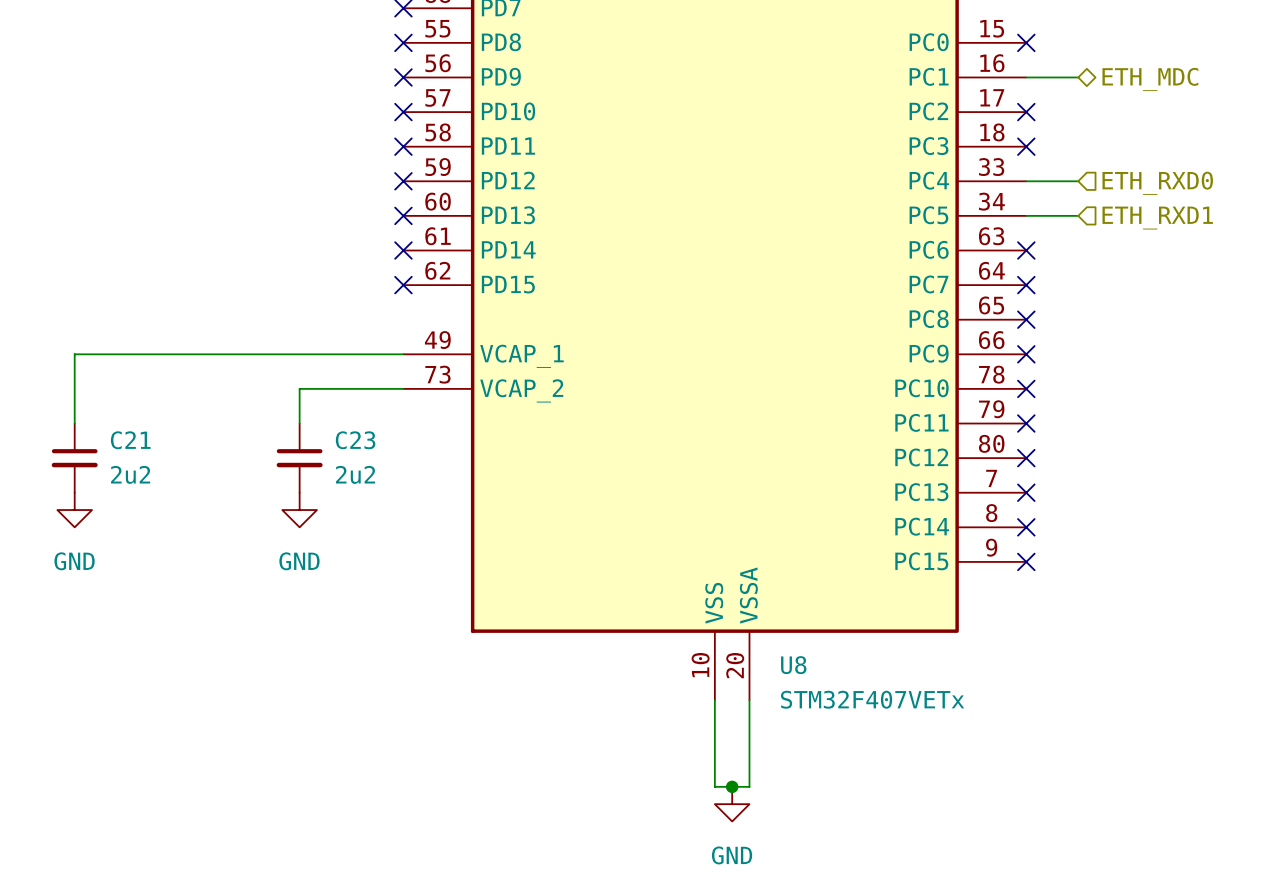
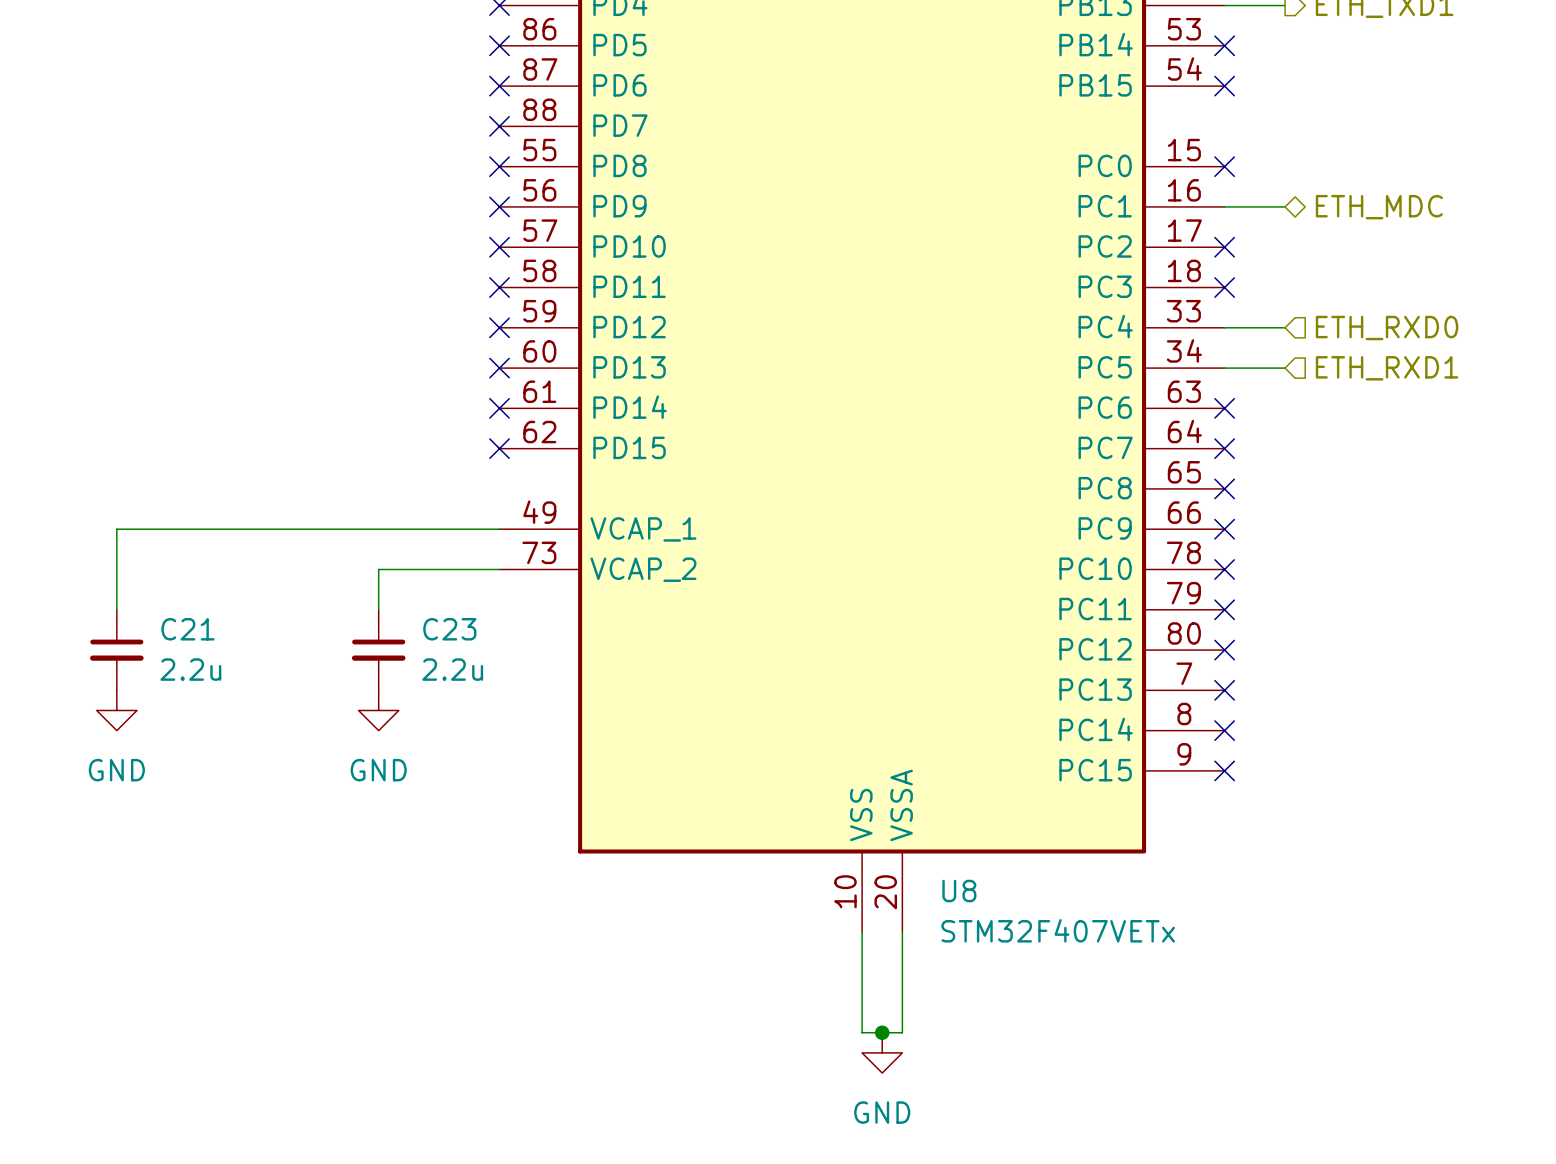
C21 value: 2u2 (130, 474) -> 2.2u (190, 669)
C23 value: 2u2 (355, 474) -> 2.2u (452, 669)

